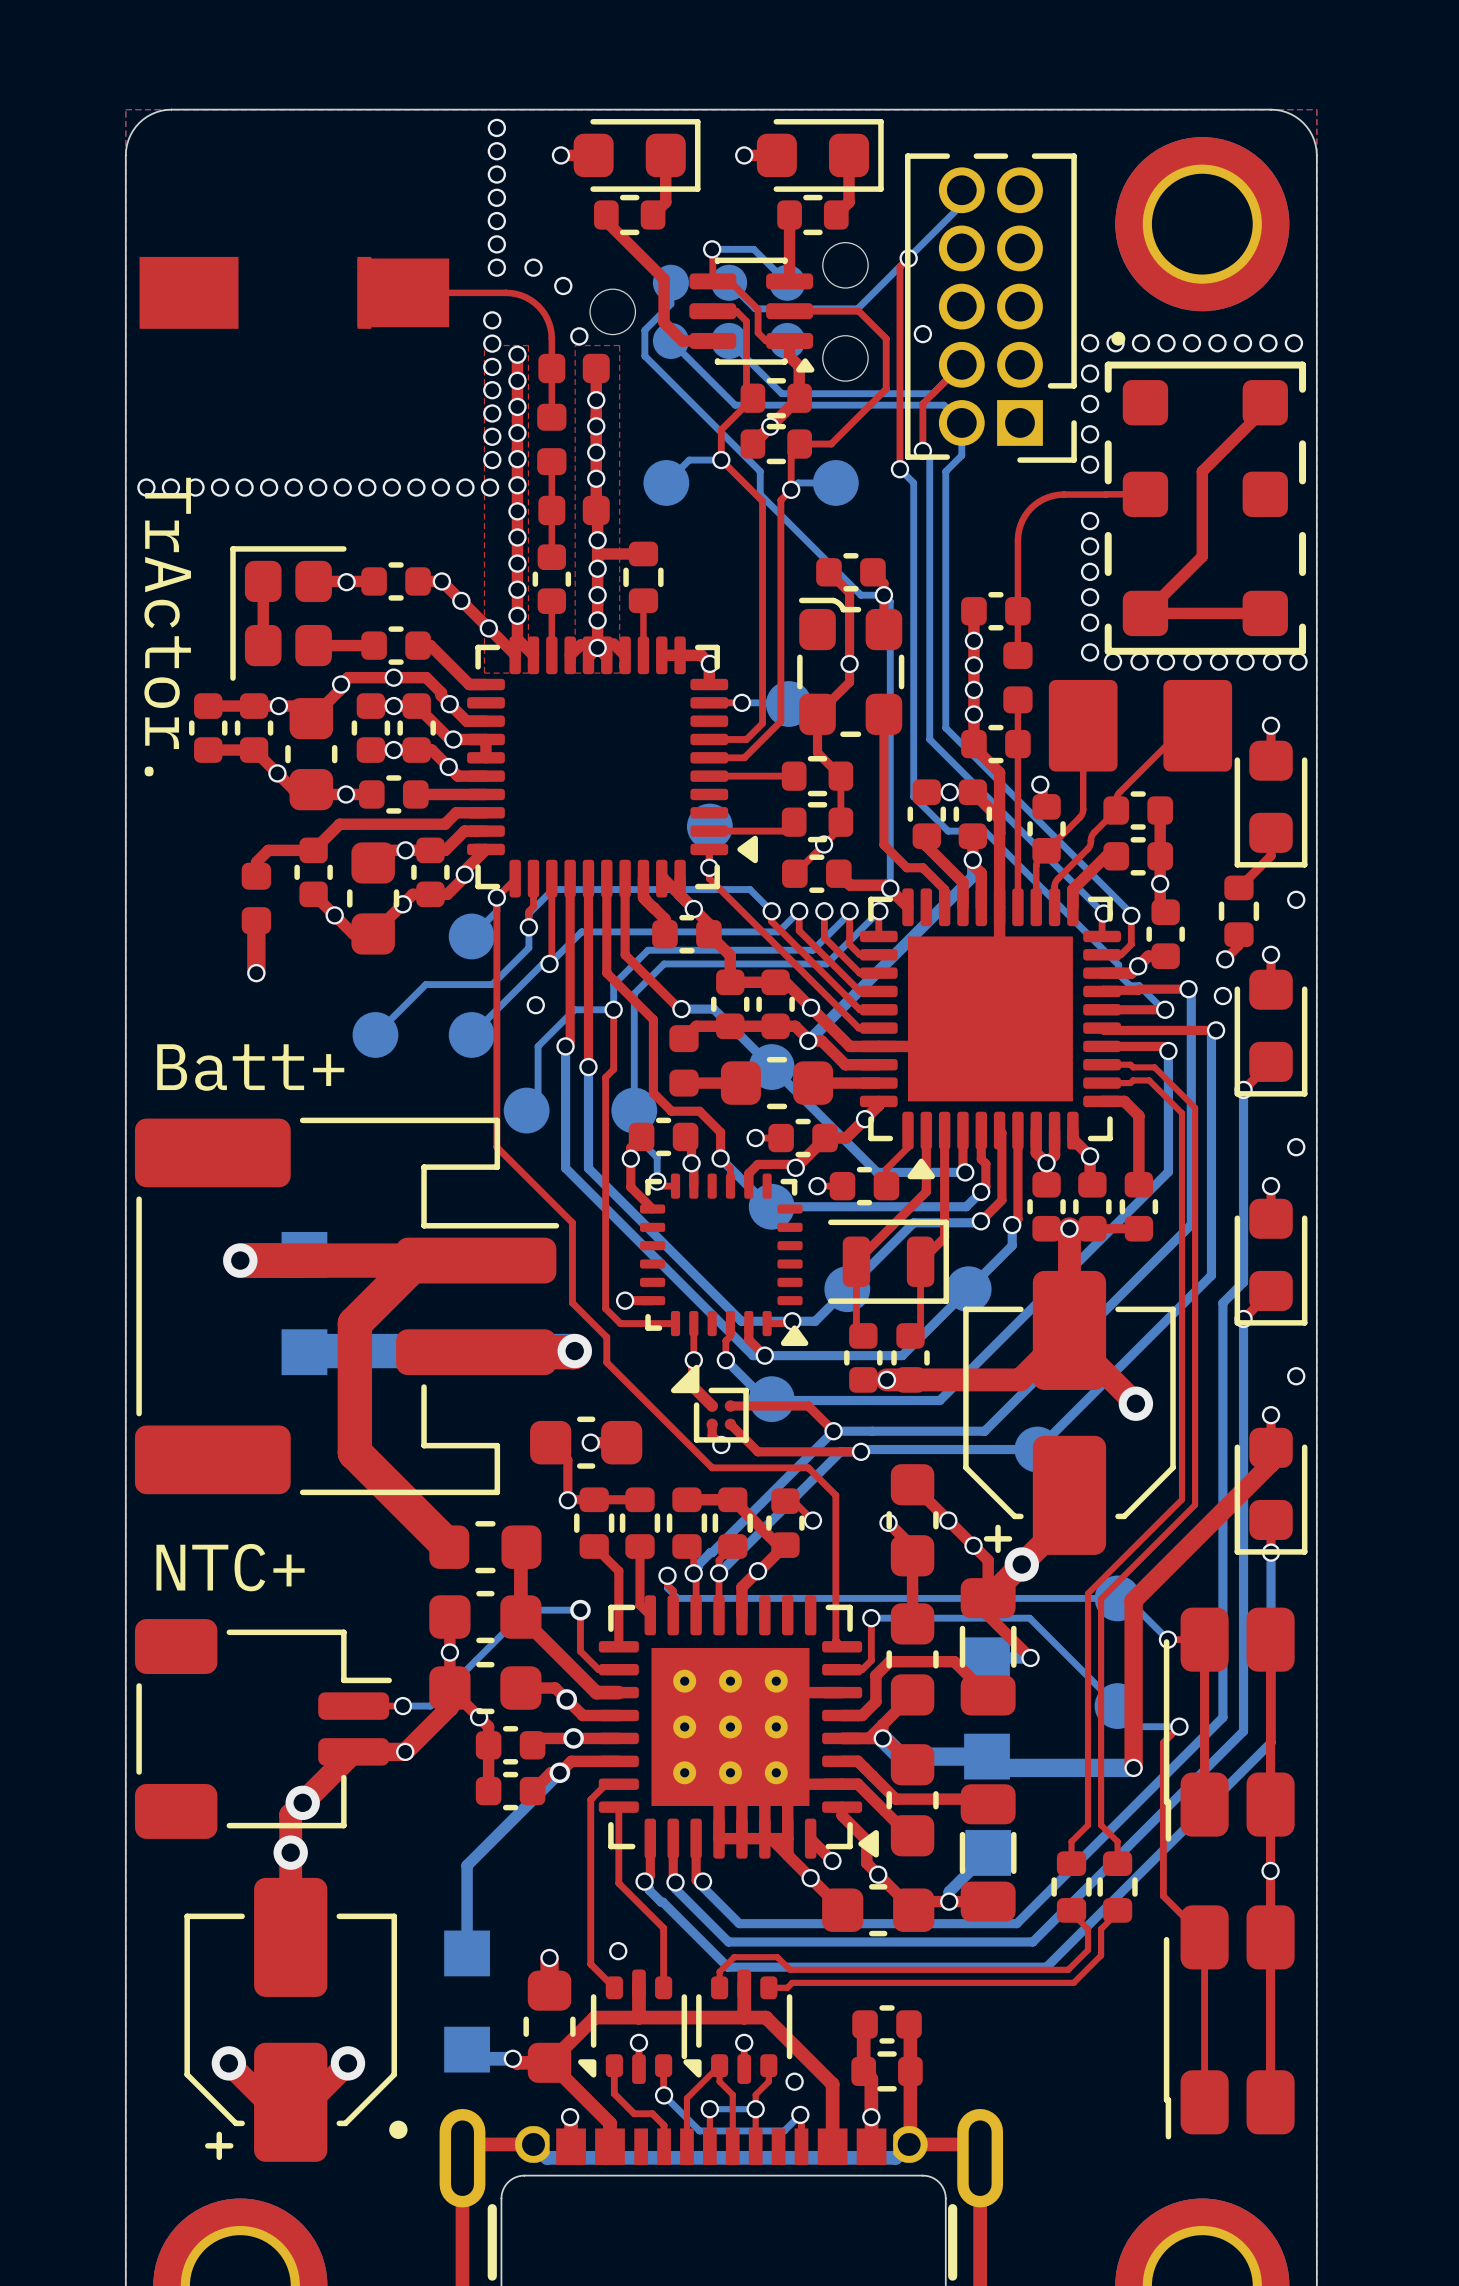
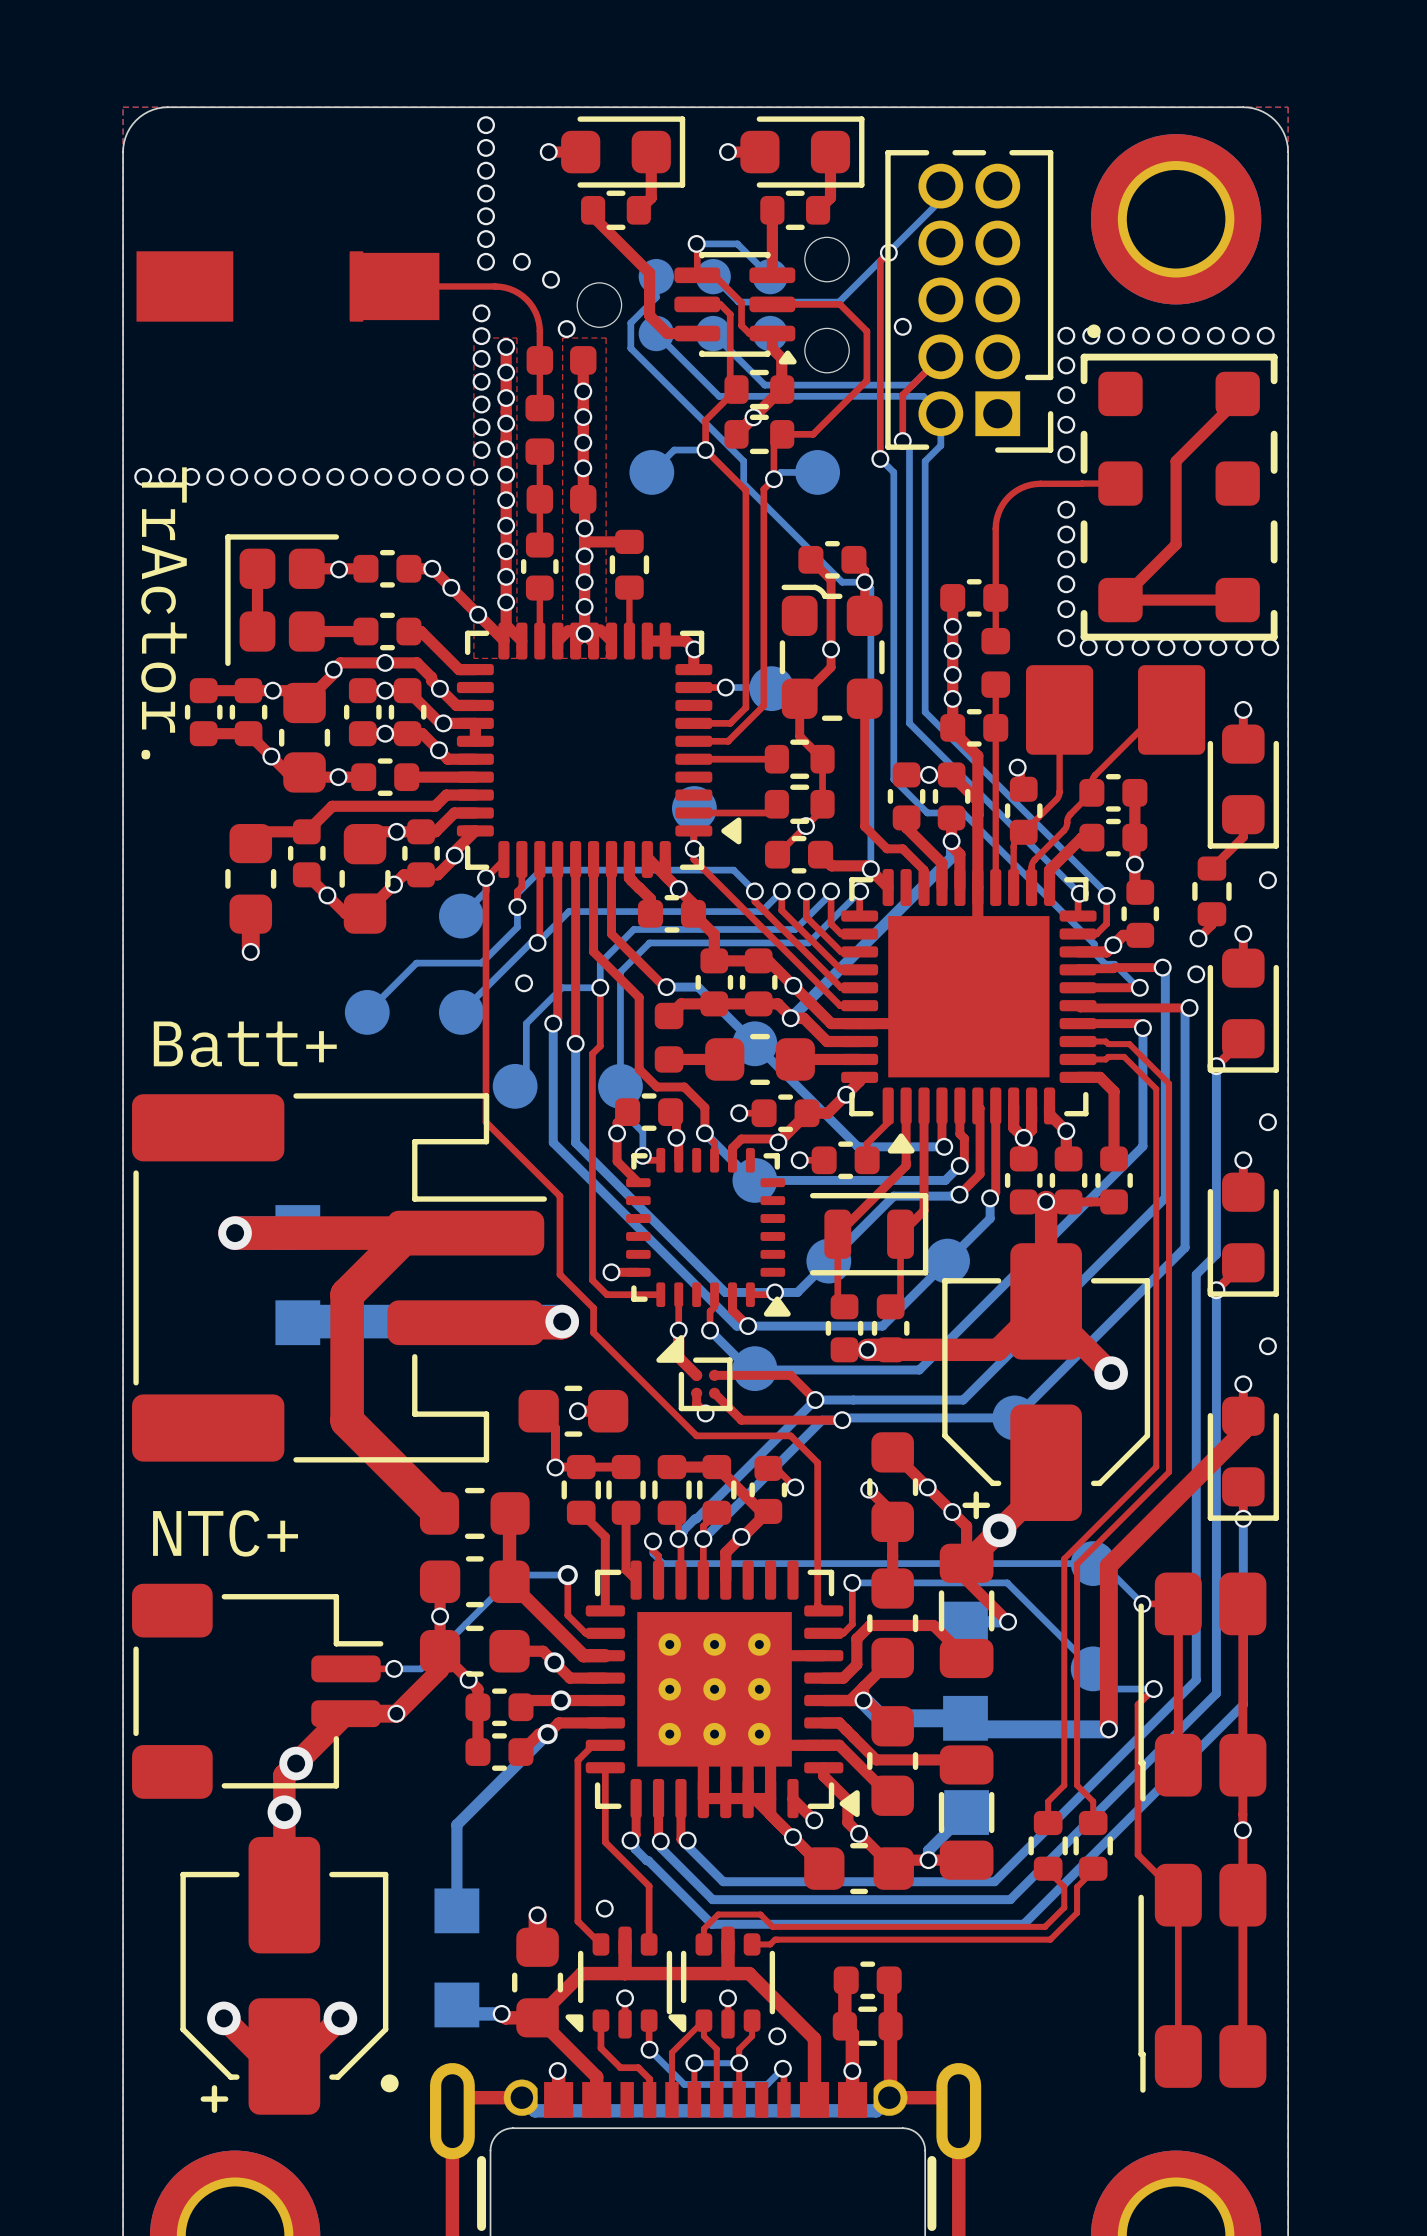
part footprint: [241, 862, 272, 935] -> [225, 823, 277, 934]

